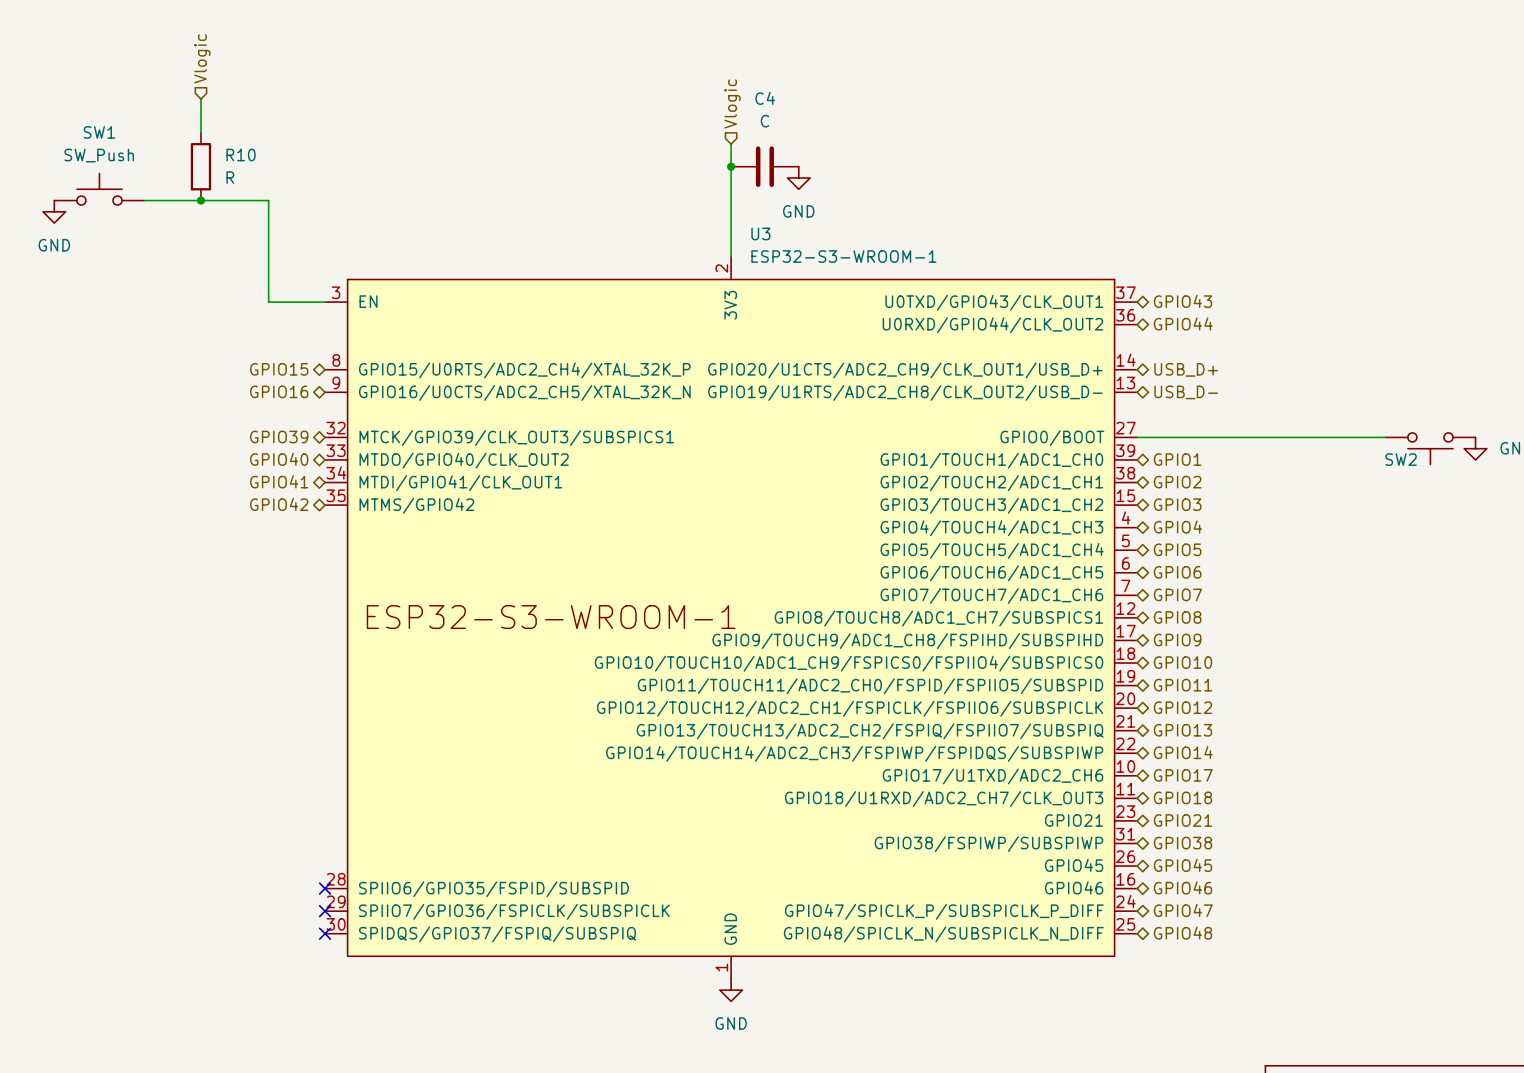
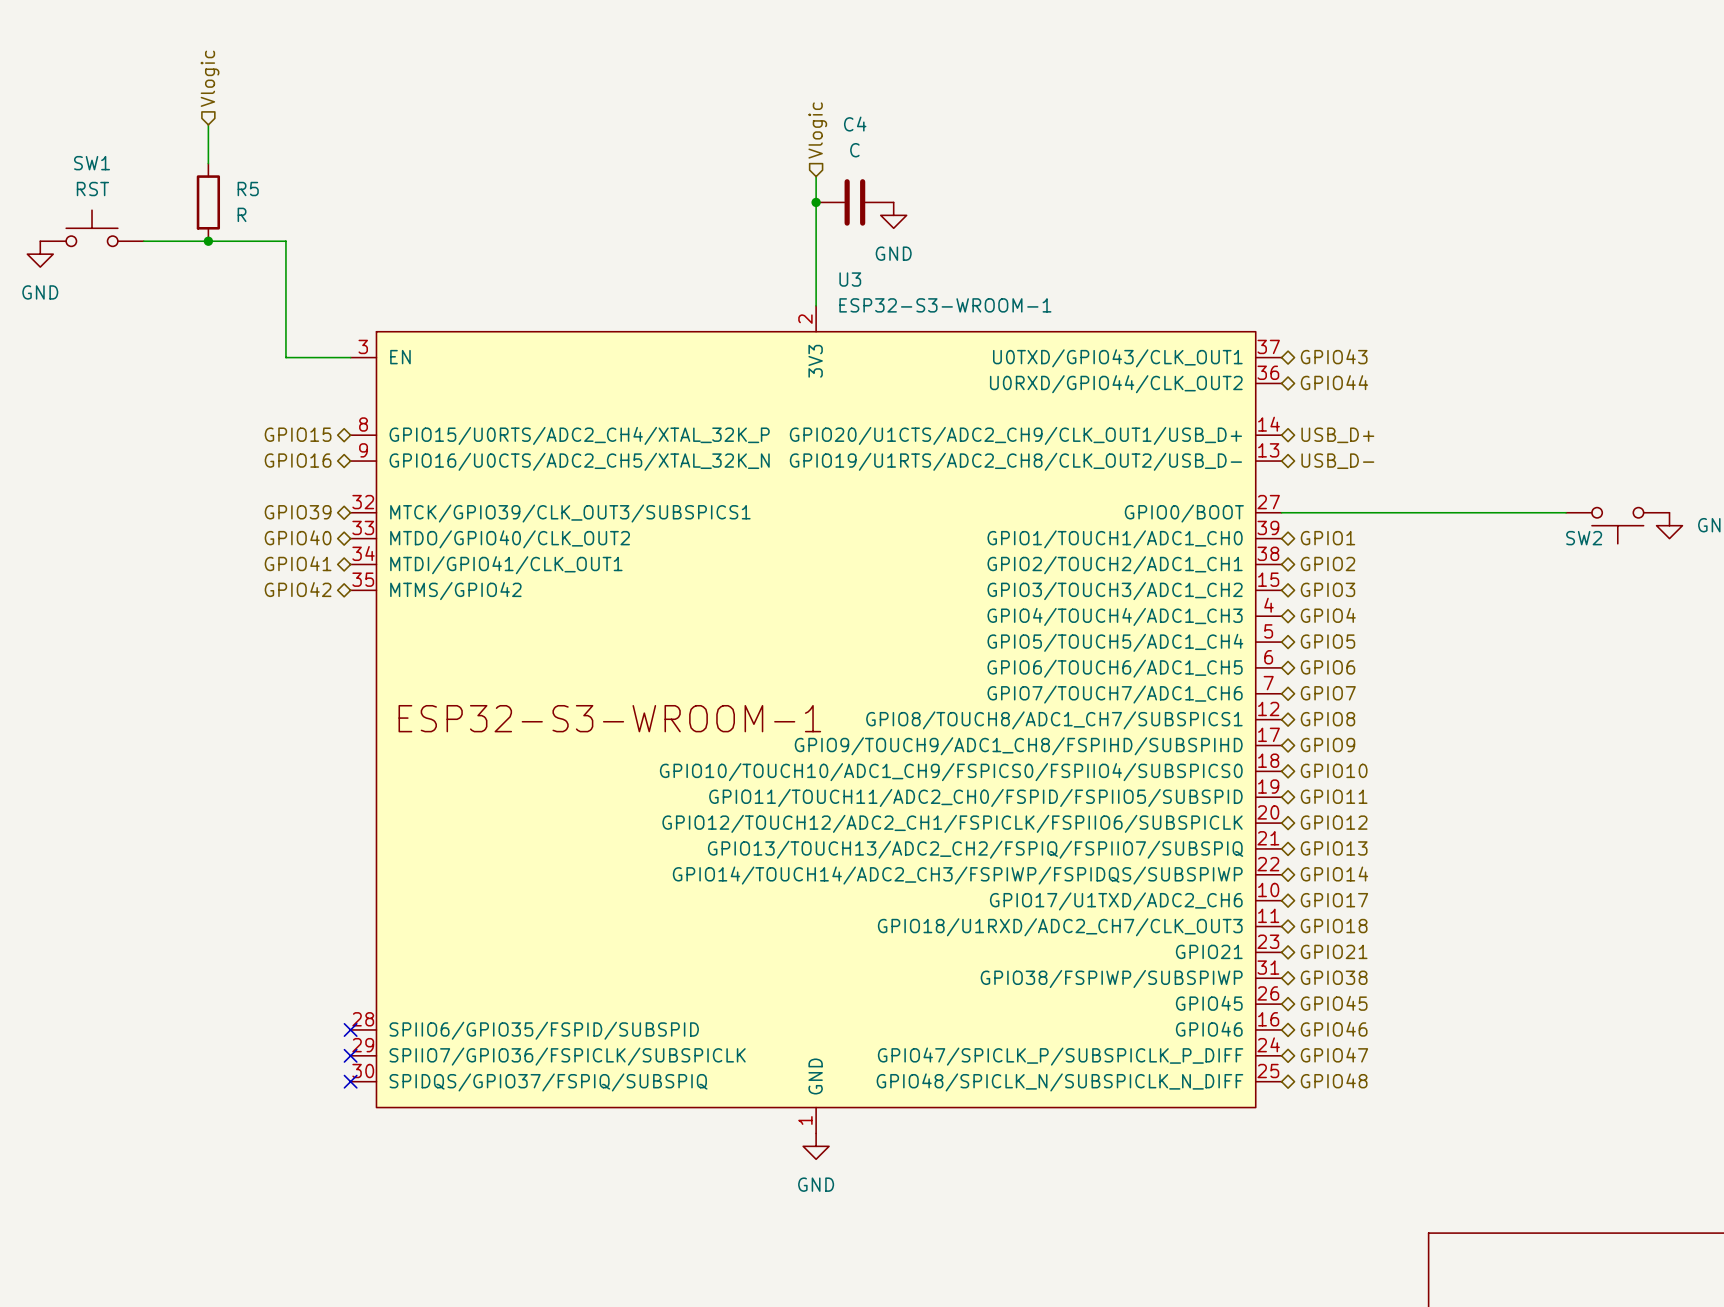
SW1 value: SW_Push (99, 155) -> RST (92, 189)
R10 name: R10 (241, 155) -> R5 (248, 189)

